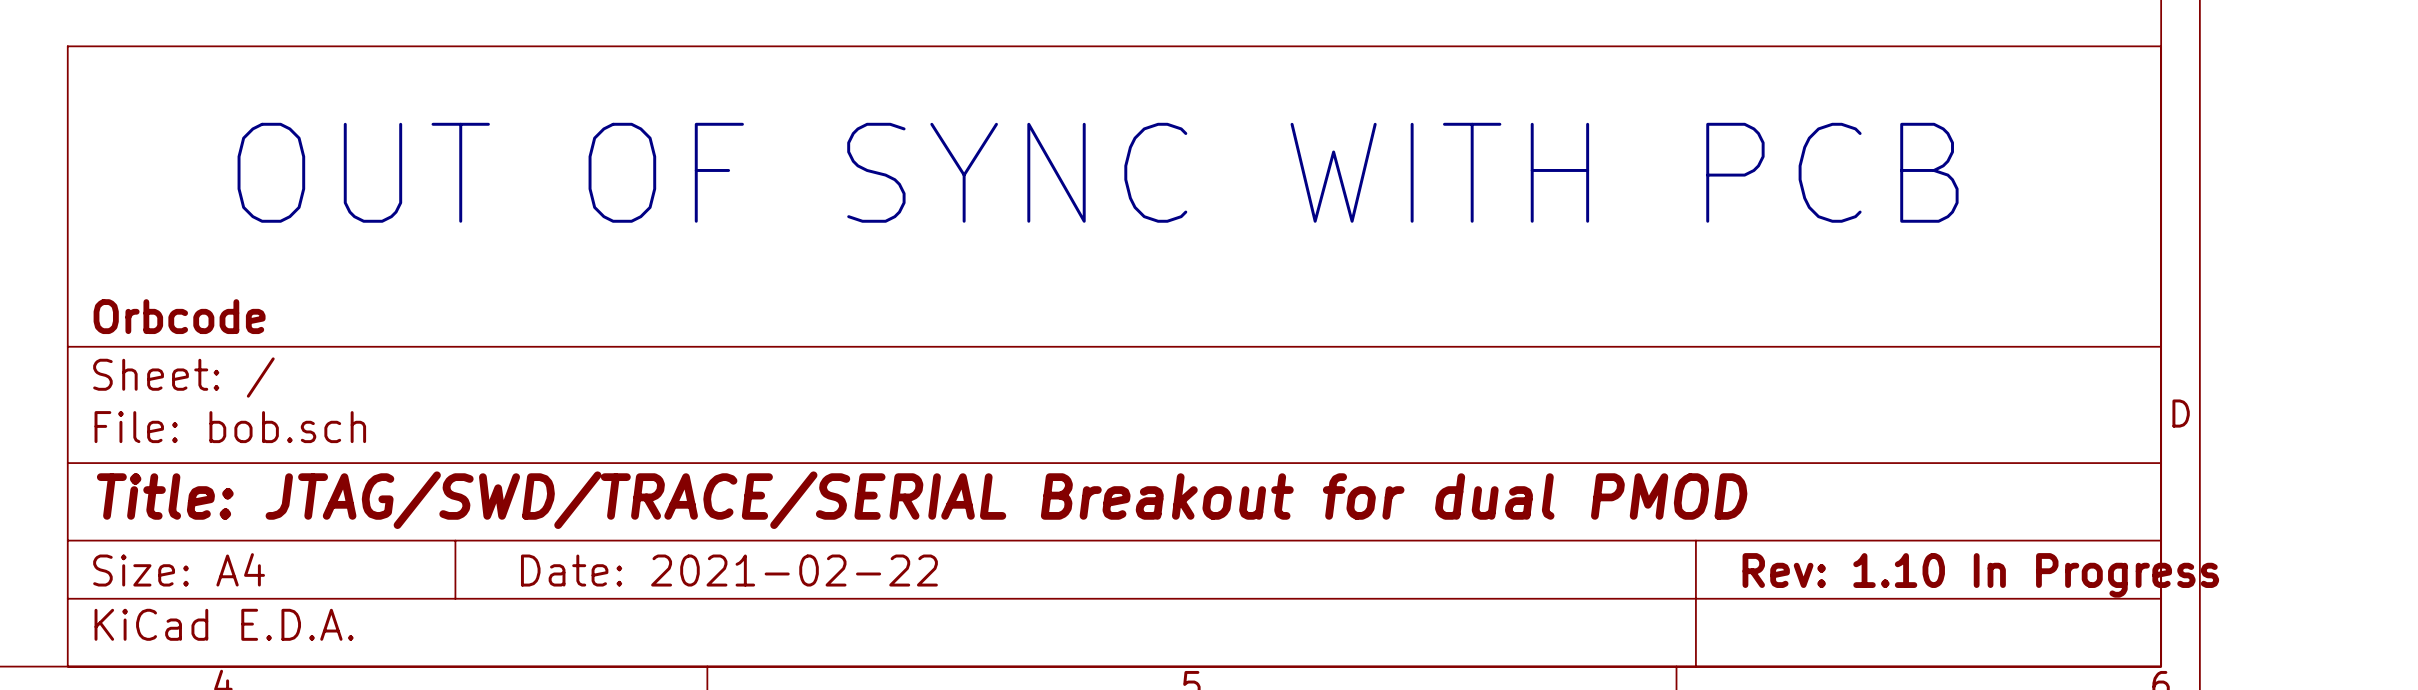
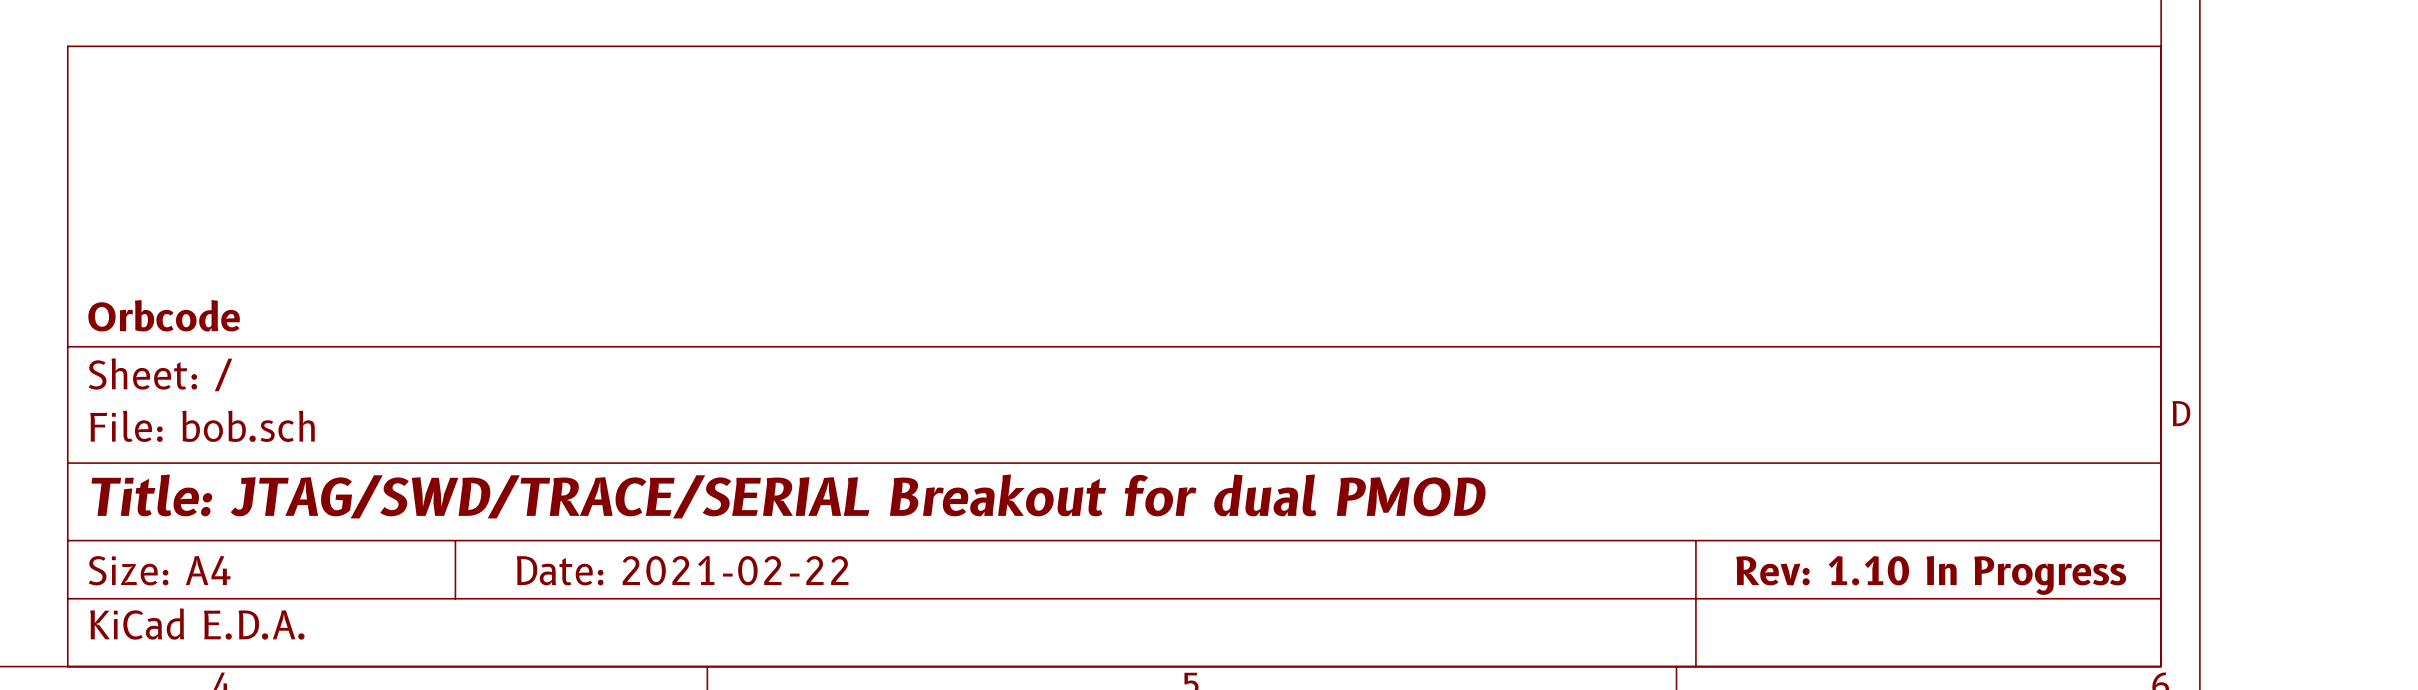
text: OUT OF SYNC WITH PCB (1098, 172) -> none

